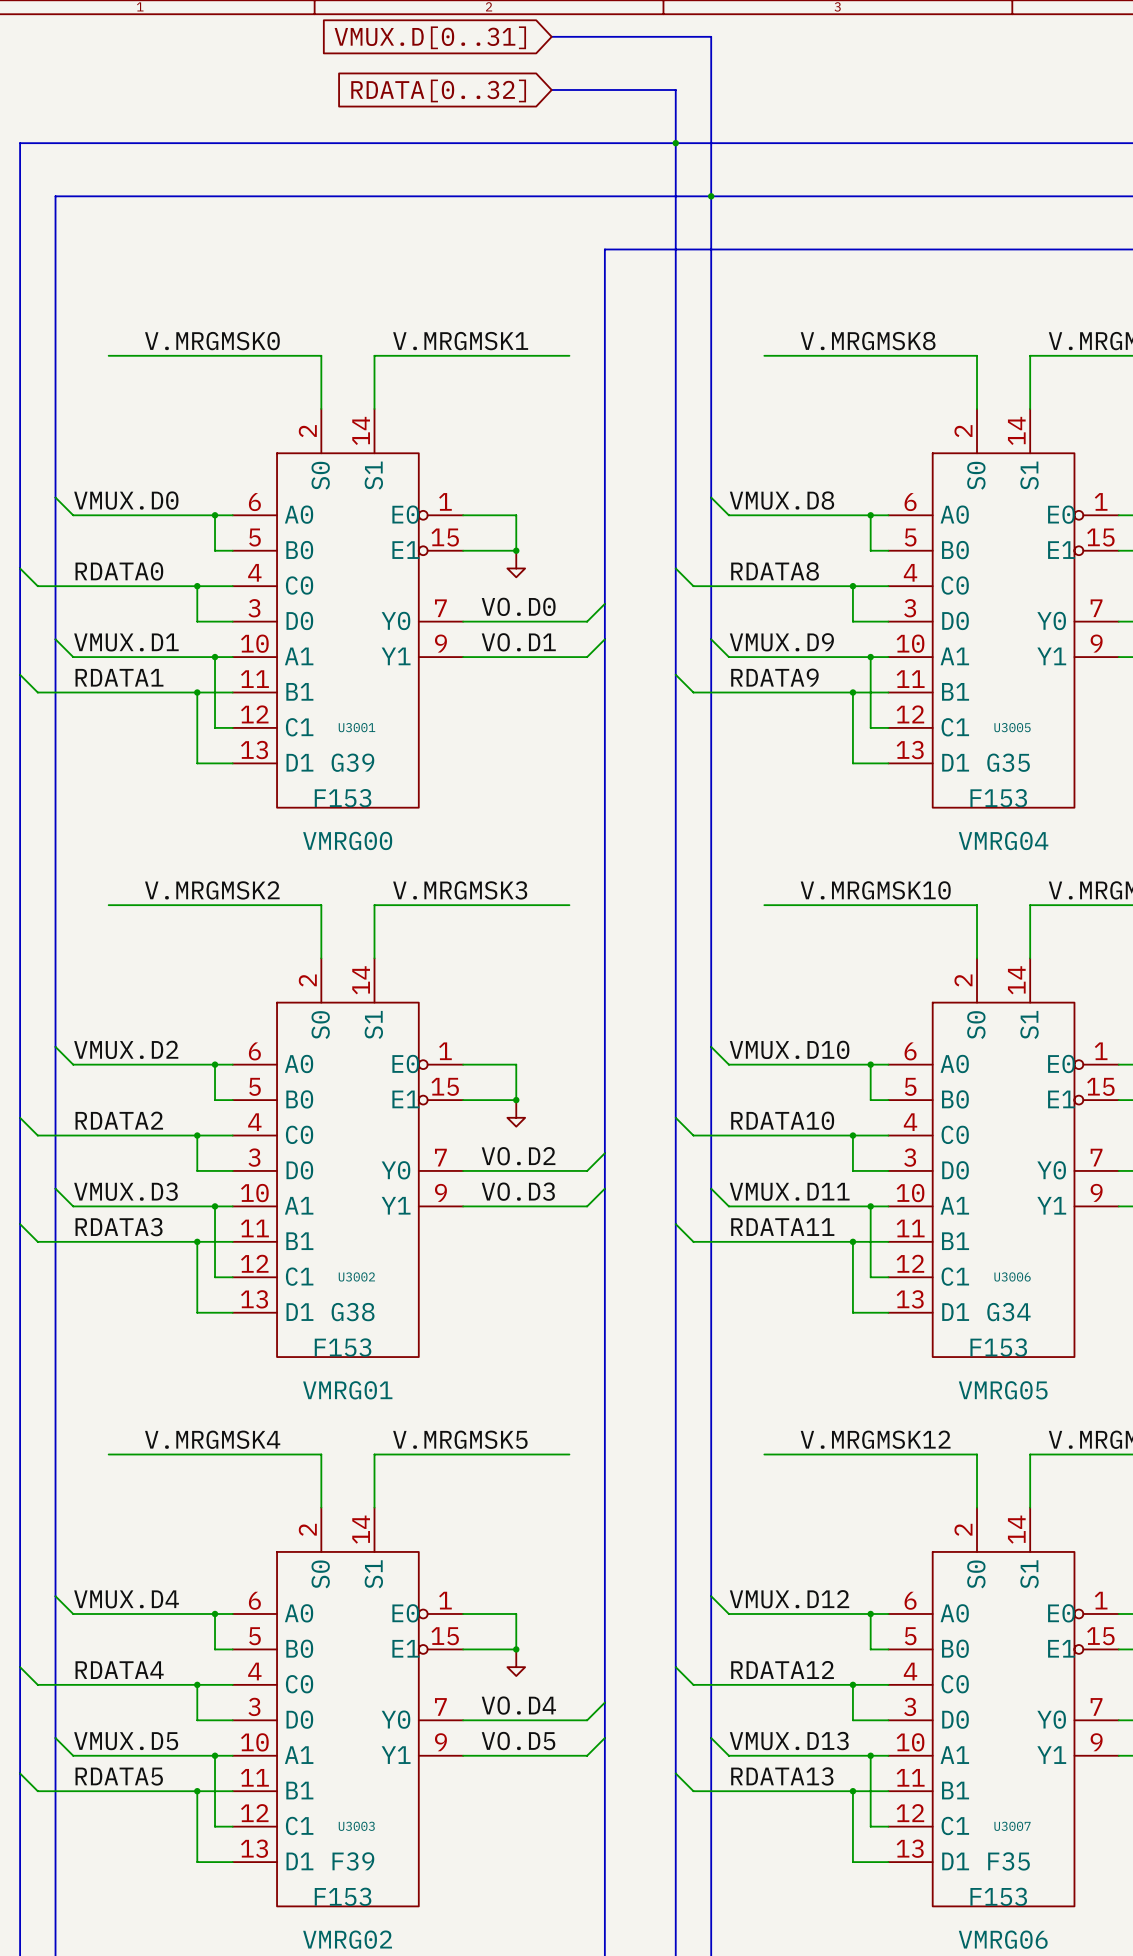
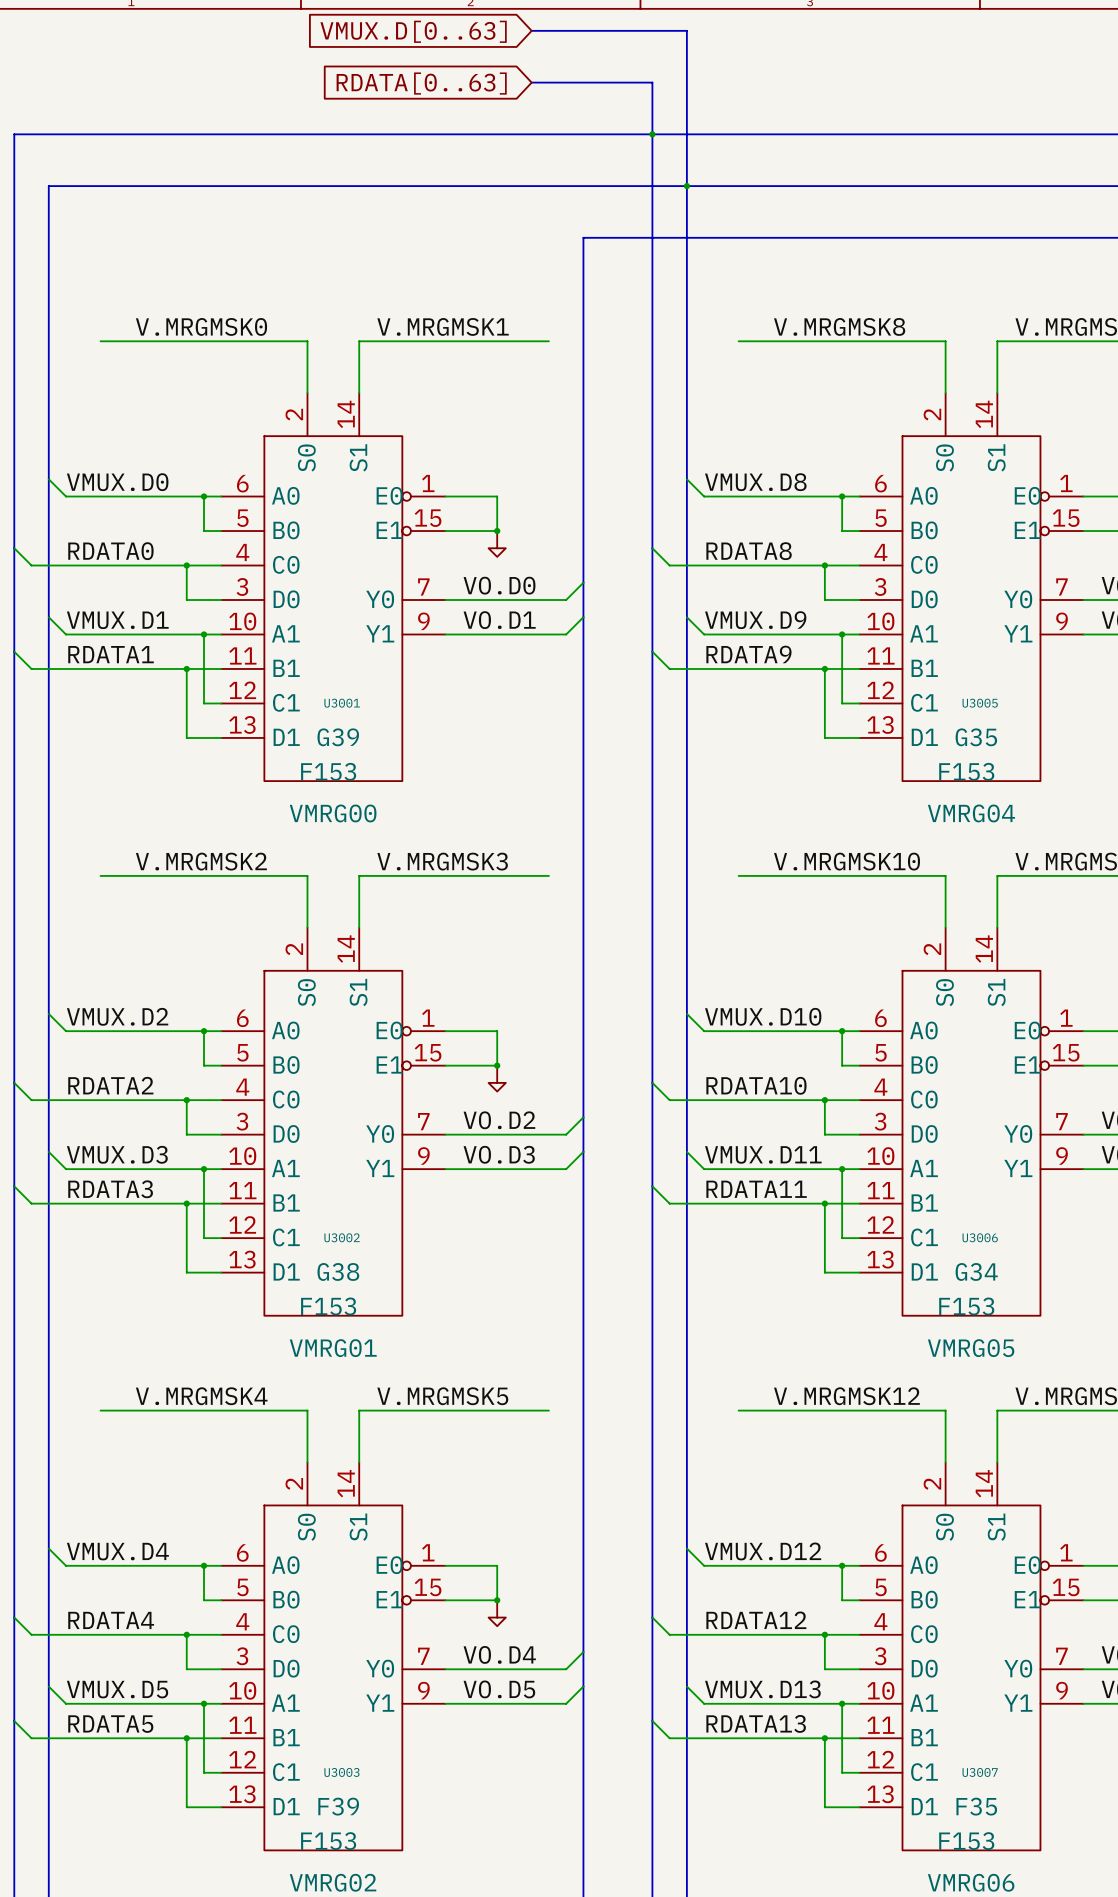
global label: VMUX.D[0..31] (430, 37) -> VMUX.D[0..63] (413, 31)
global label: RDATA[0..32] (438, 90) -> RDATA[0..63] (421, 83)

